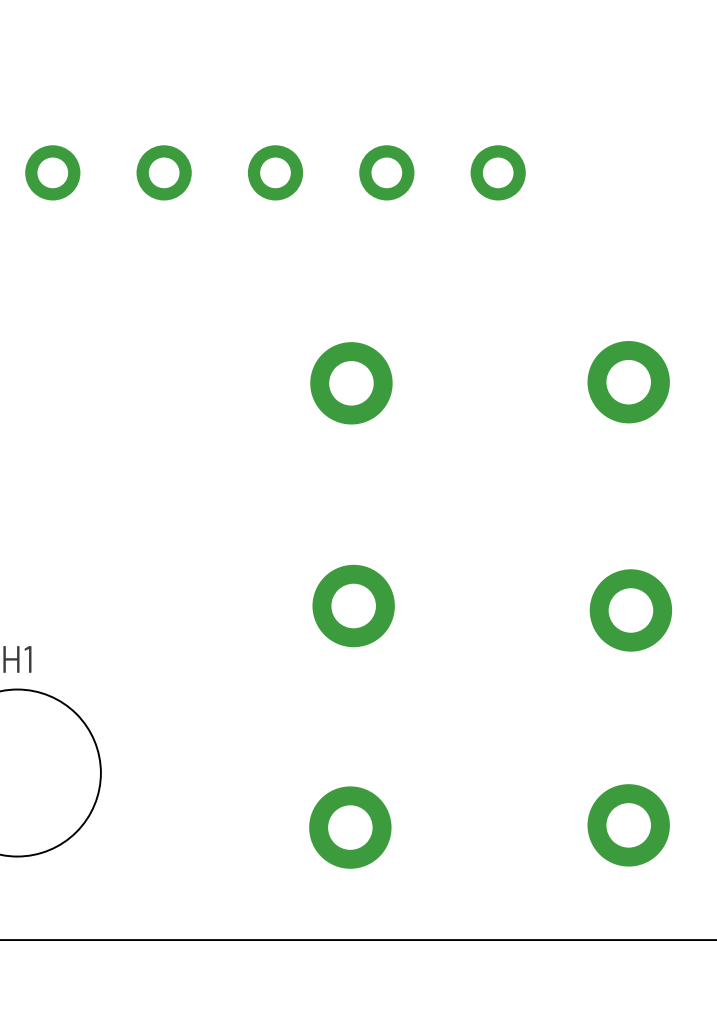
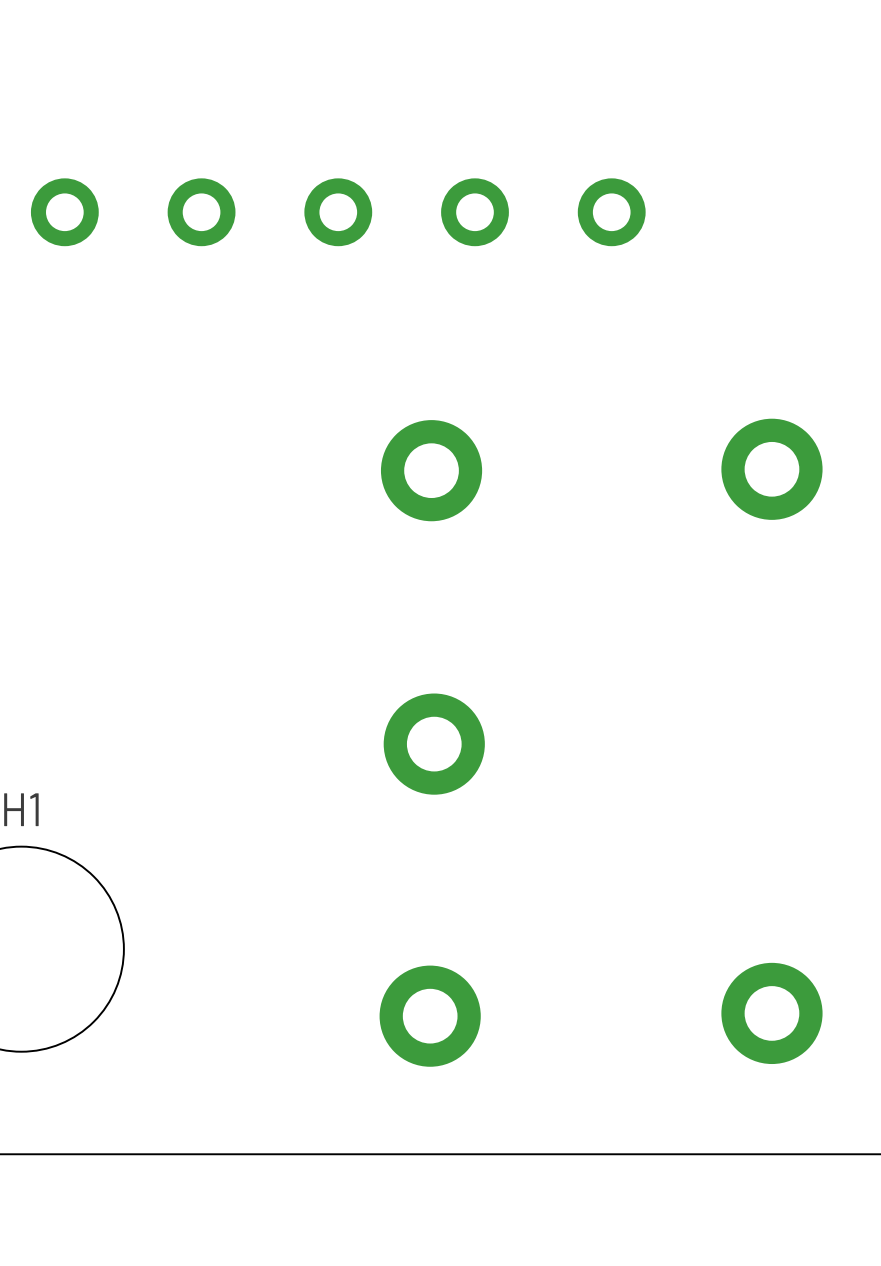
part: (630, 610) -> none

